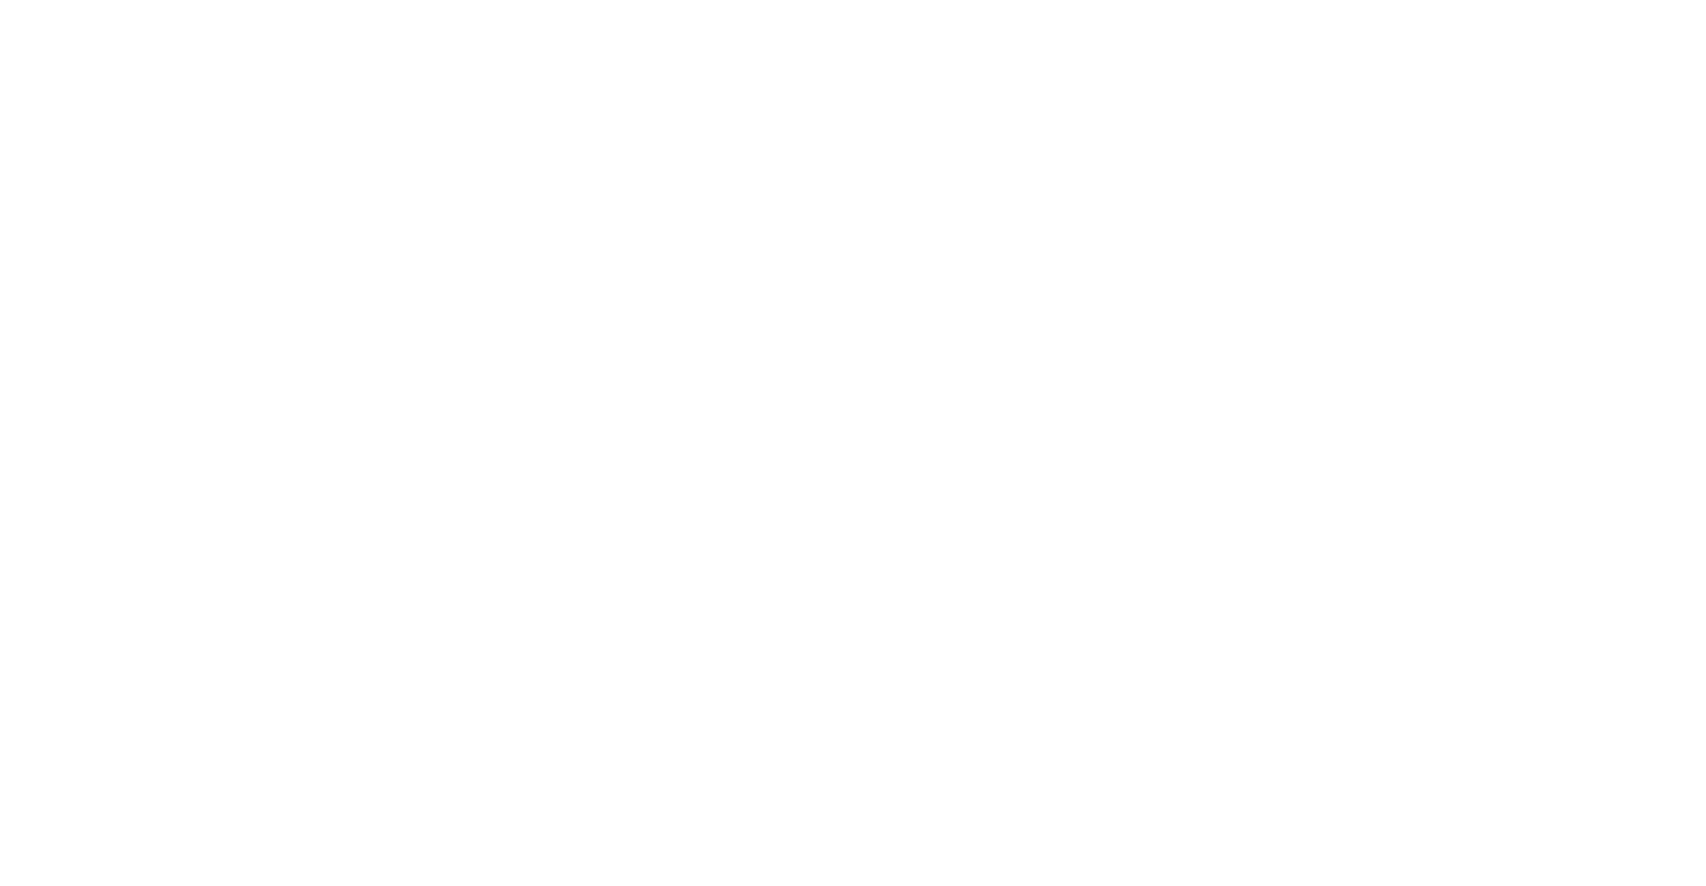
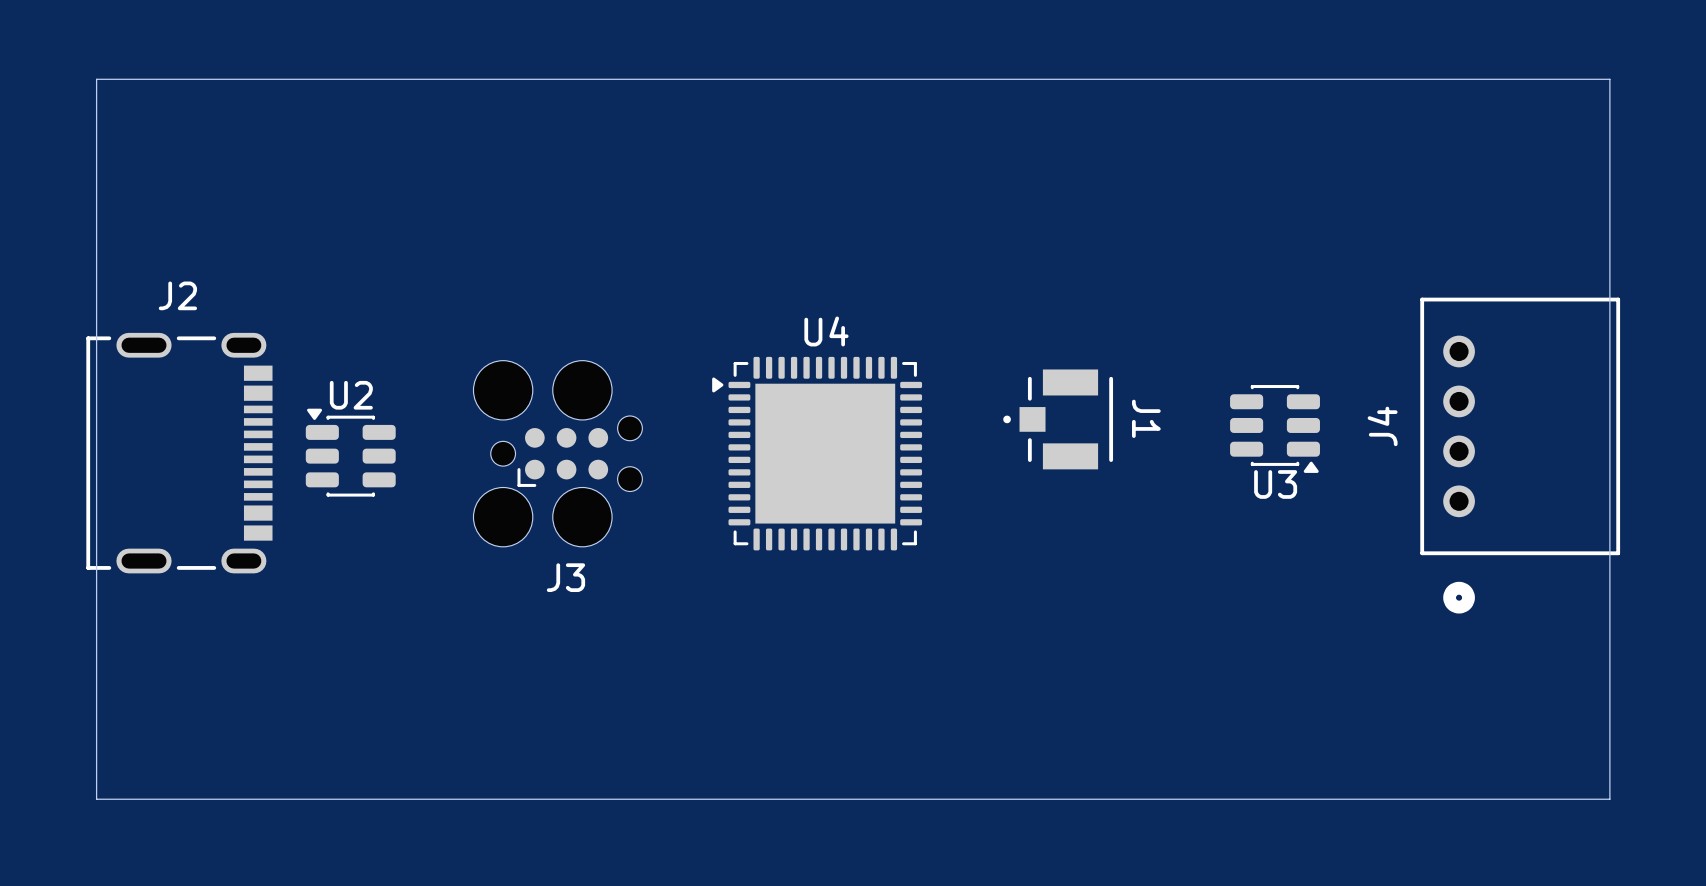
board edge: none -> (96, 79) (1609, 79) (1609, 799) (96, 799) (96, 79)
J1: none -> (1058, 419)
U3: none -> (1275, 428)
U2: none -> (350, 452)
J2: none -> (179, 453)
J3: none -> (557, 453)
U4: none -> (817, 453)
J4: none -> (1520, 455)

